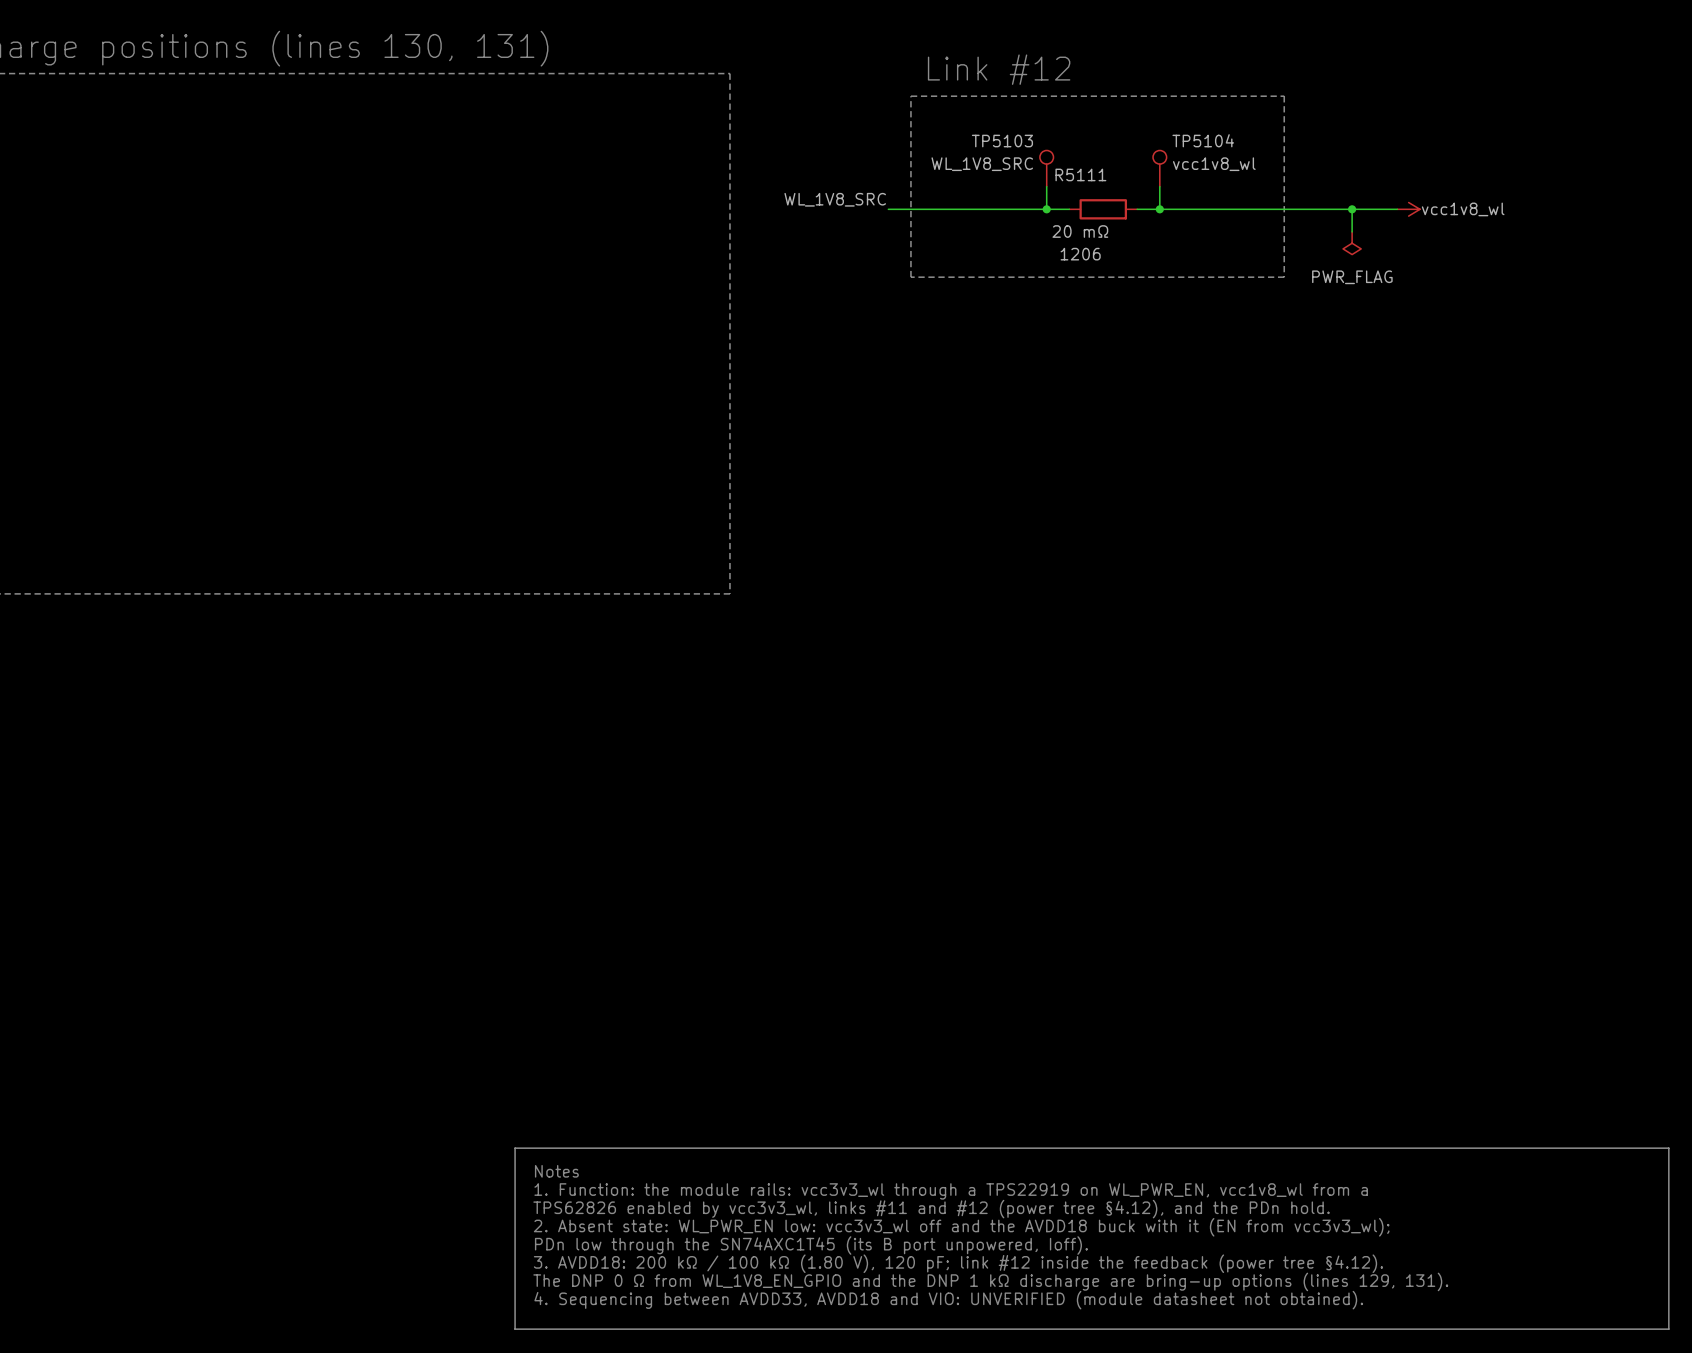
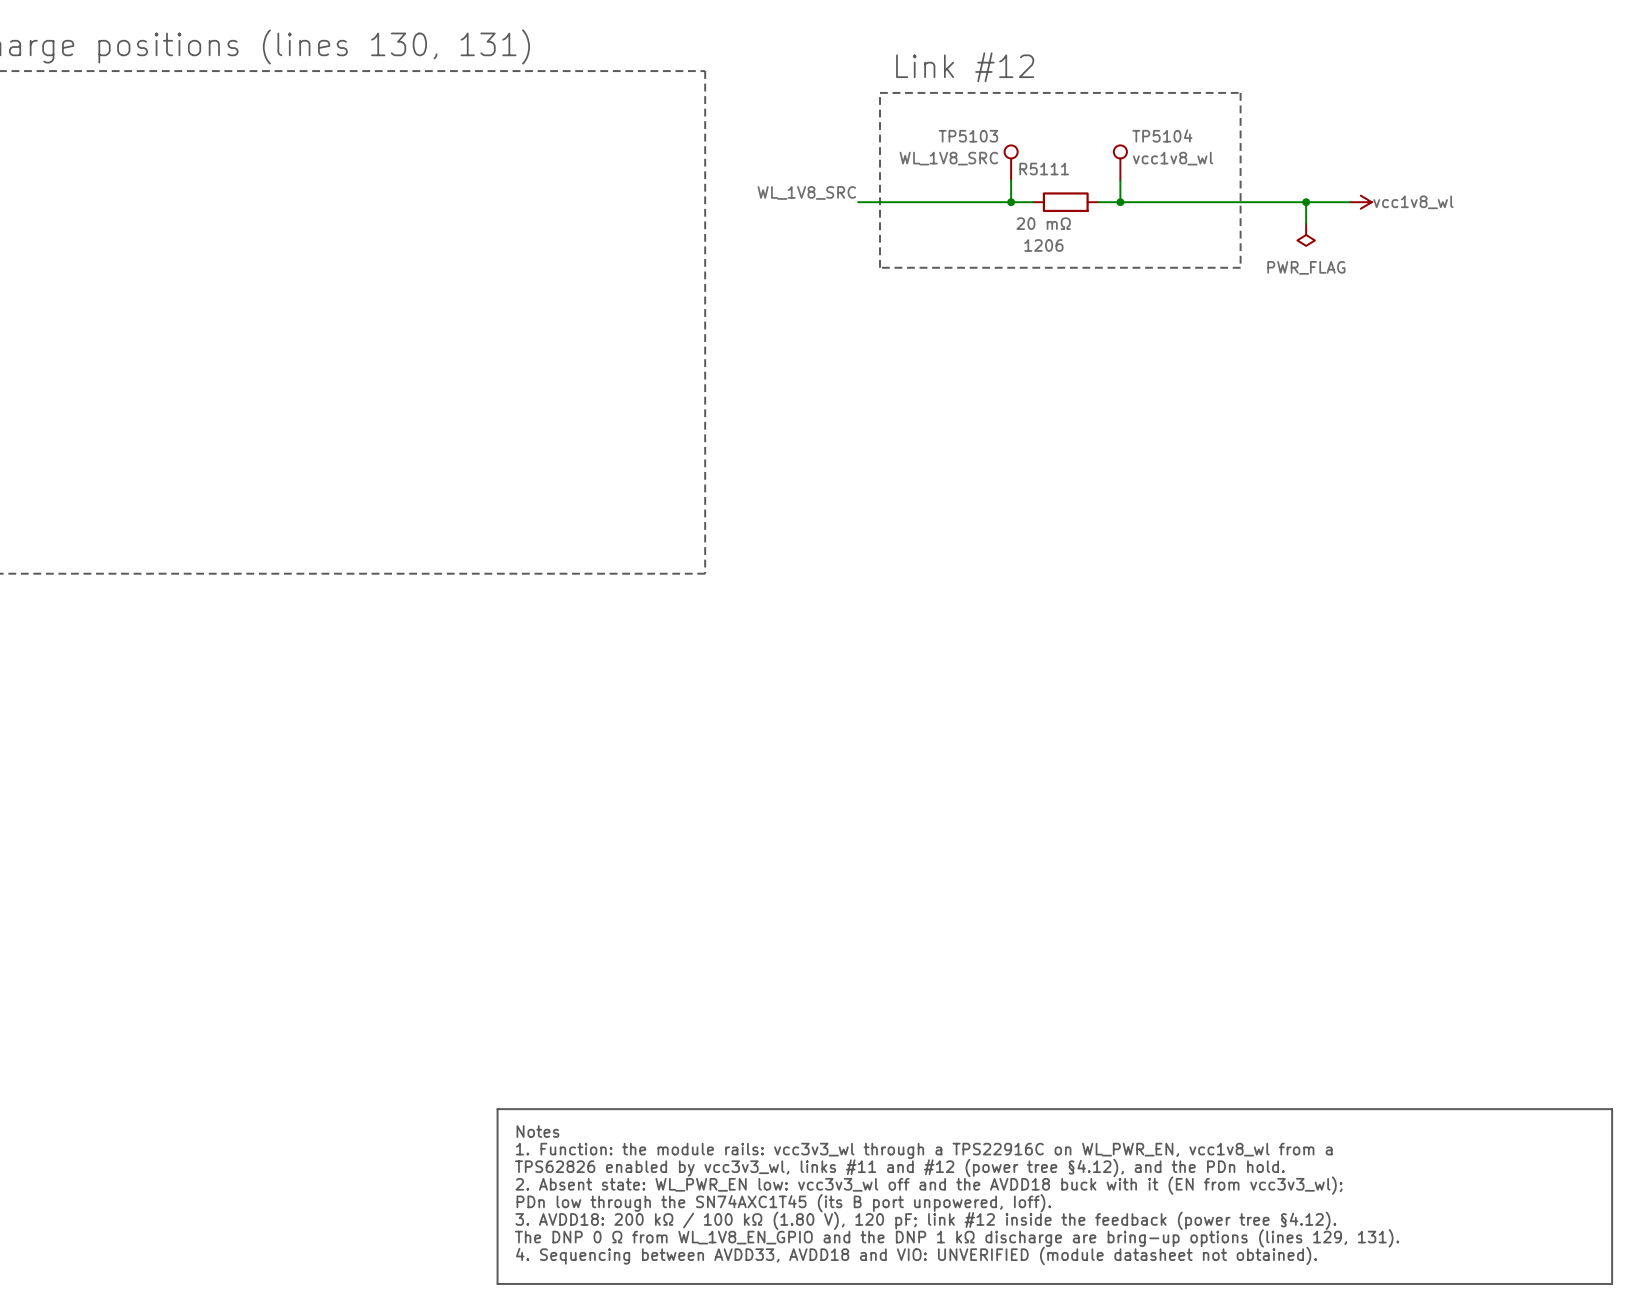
text: 1. Function: the module rails: vcc3v3_wl through a TPS22919 on WL_PWR_EN, vcc1v8_wl from a (951, 1191) -> 1. Function: the module rails: vcc3v3_wl through a TPS22916C on WL_PWR_EN, vcc1v8_wl from a (924, 1150)

